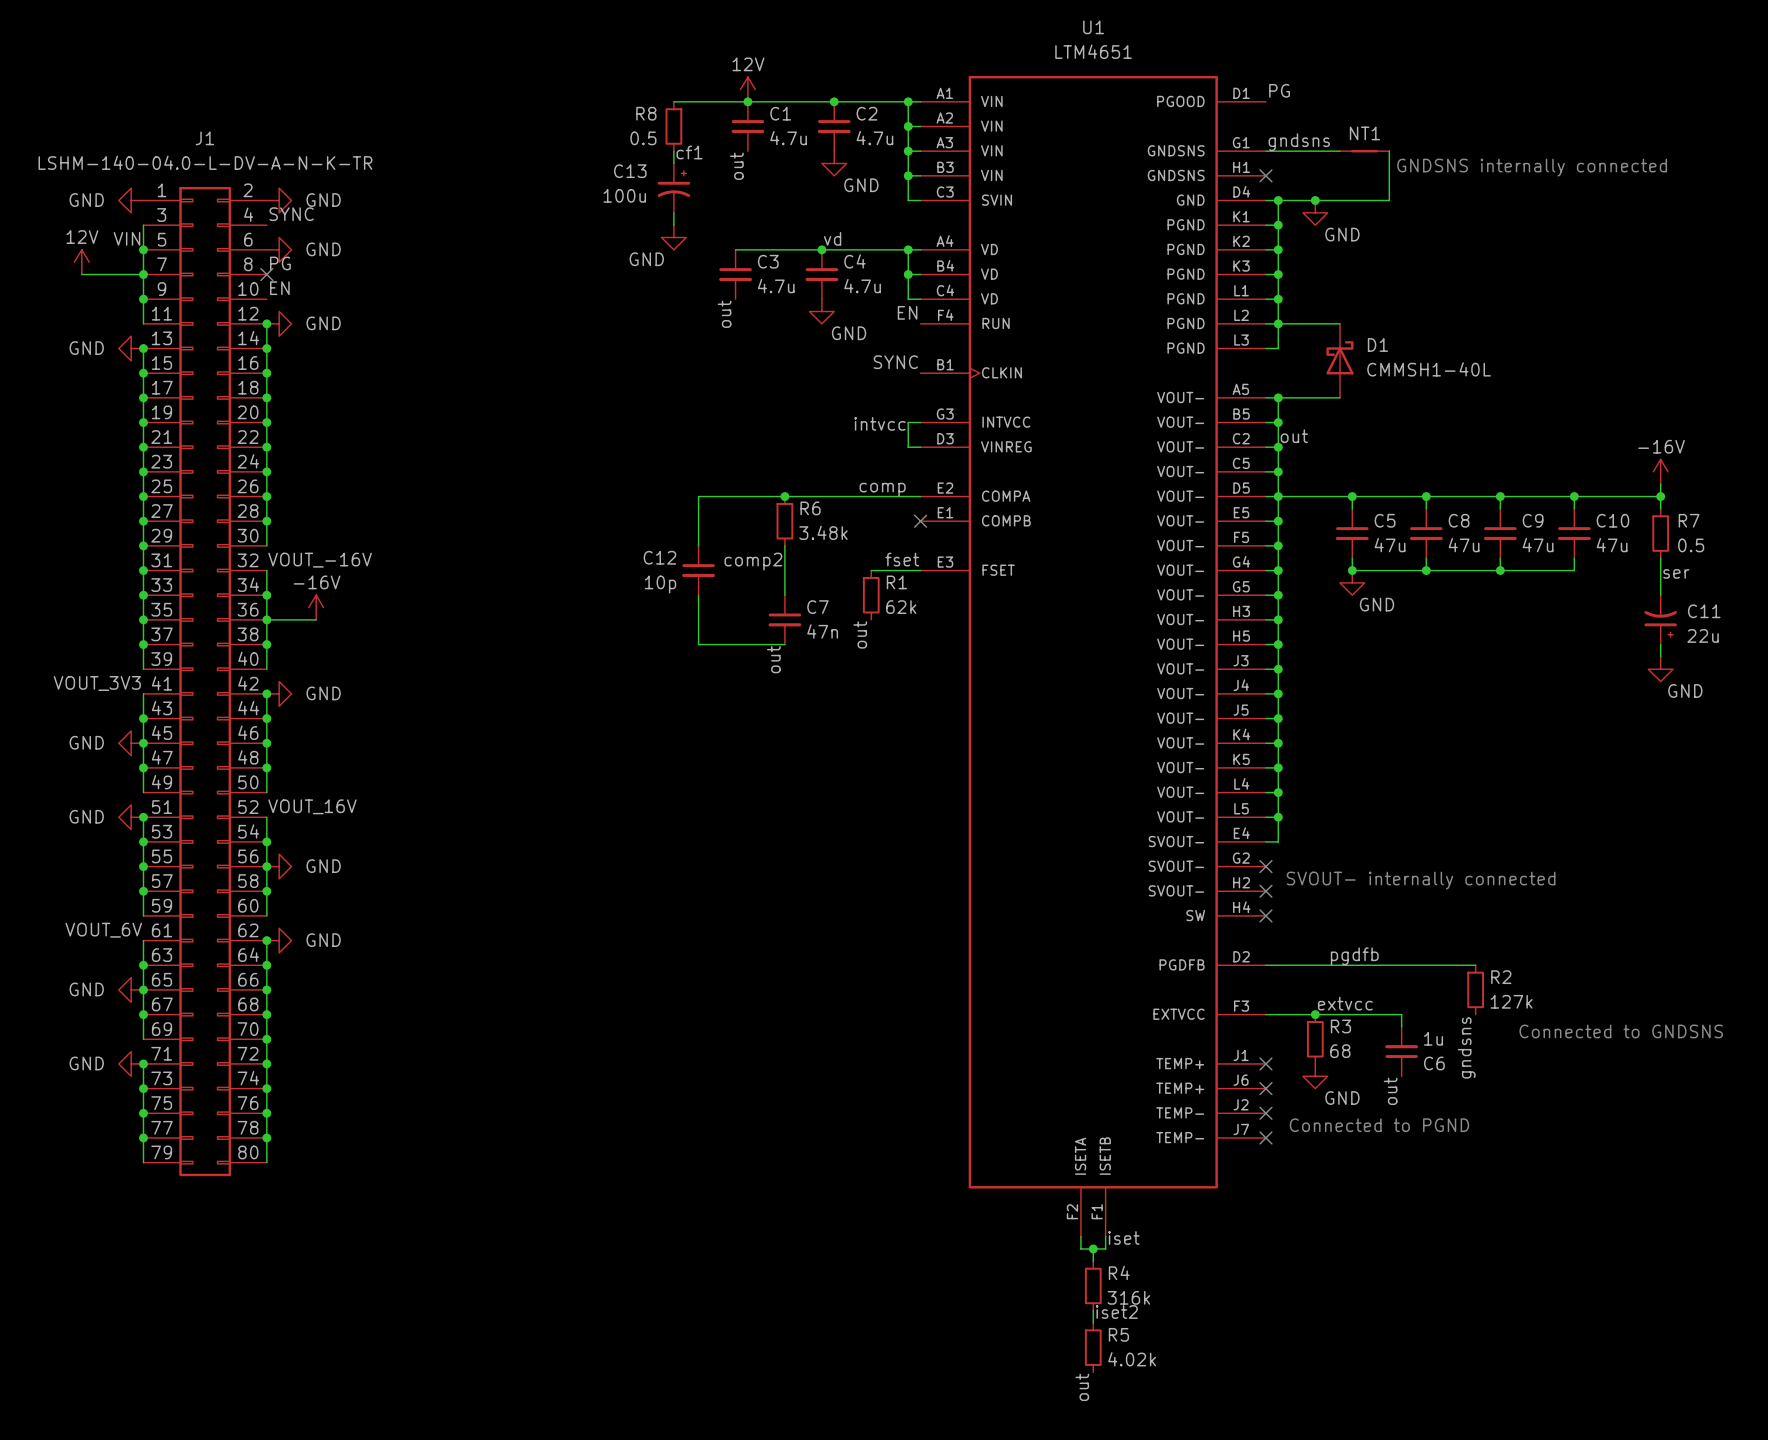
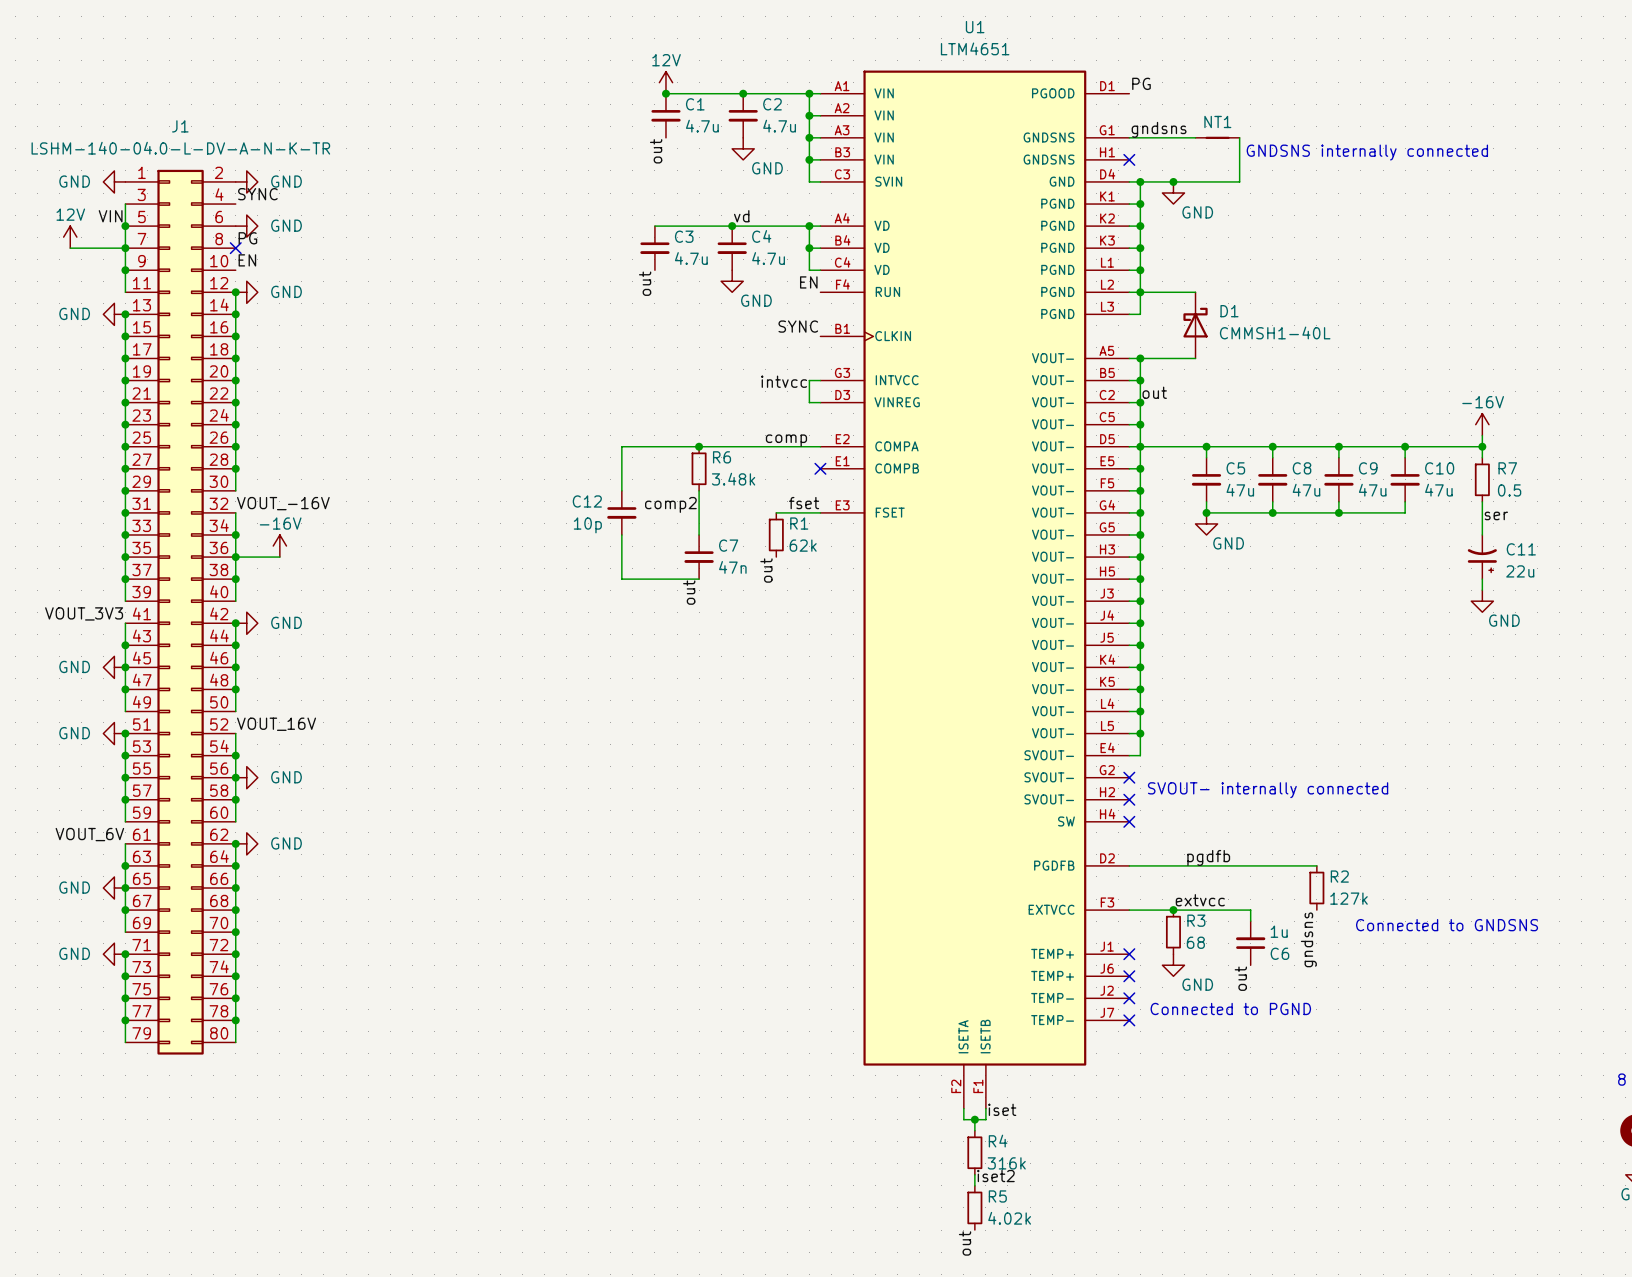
wire: (673, 101) (747, 101) -> none
R8: 0.5 (673, 126) -> none
wire: (673, 151) (673, 163) -> none
label: cf1 (689, 152) -> none
C13: 100u (673, 188) -> none
wire: (673, 212) (673, 225) -> none
power symbol: GND (673, 237) -> none

